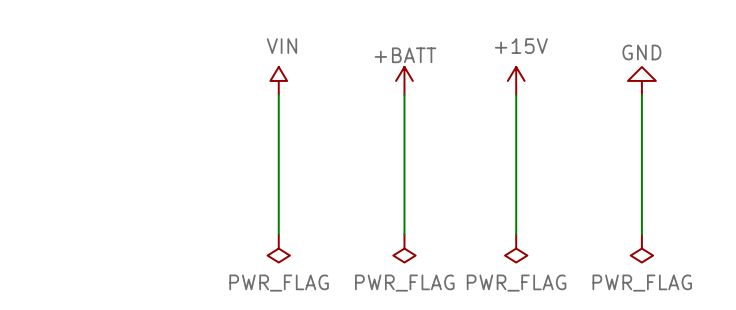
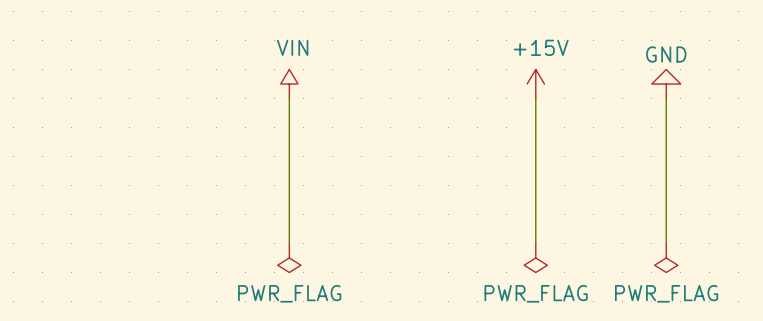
power symbol: +BATT (404, 80) -> none
wire: (404, 94) (404, 234) -> none
power symbol: PWR_FLAG (404, 248) -> none

